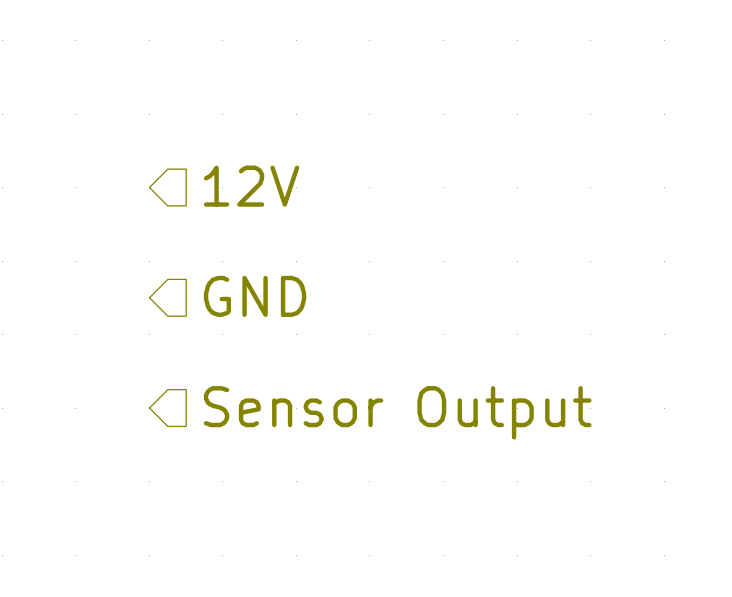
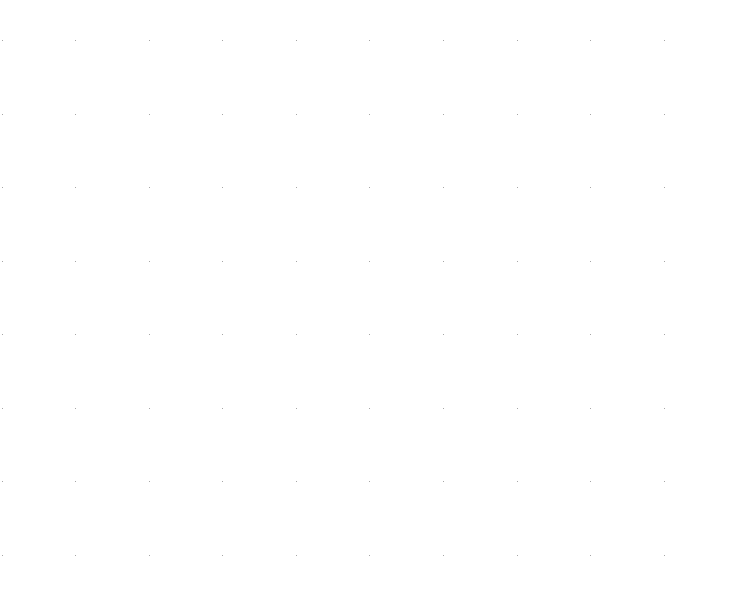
hierarchical label: 12V (251, 186) -> none
hierarchical label: GND (255, 296) -> none
hierarchical label: Sensor Output (397, 412) -> none

